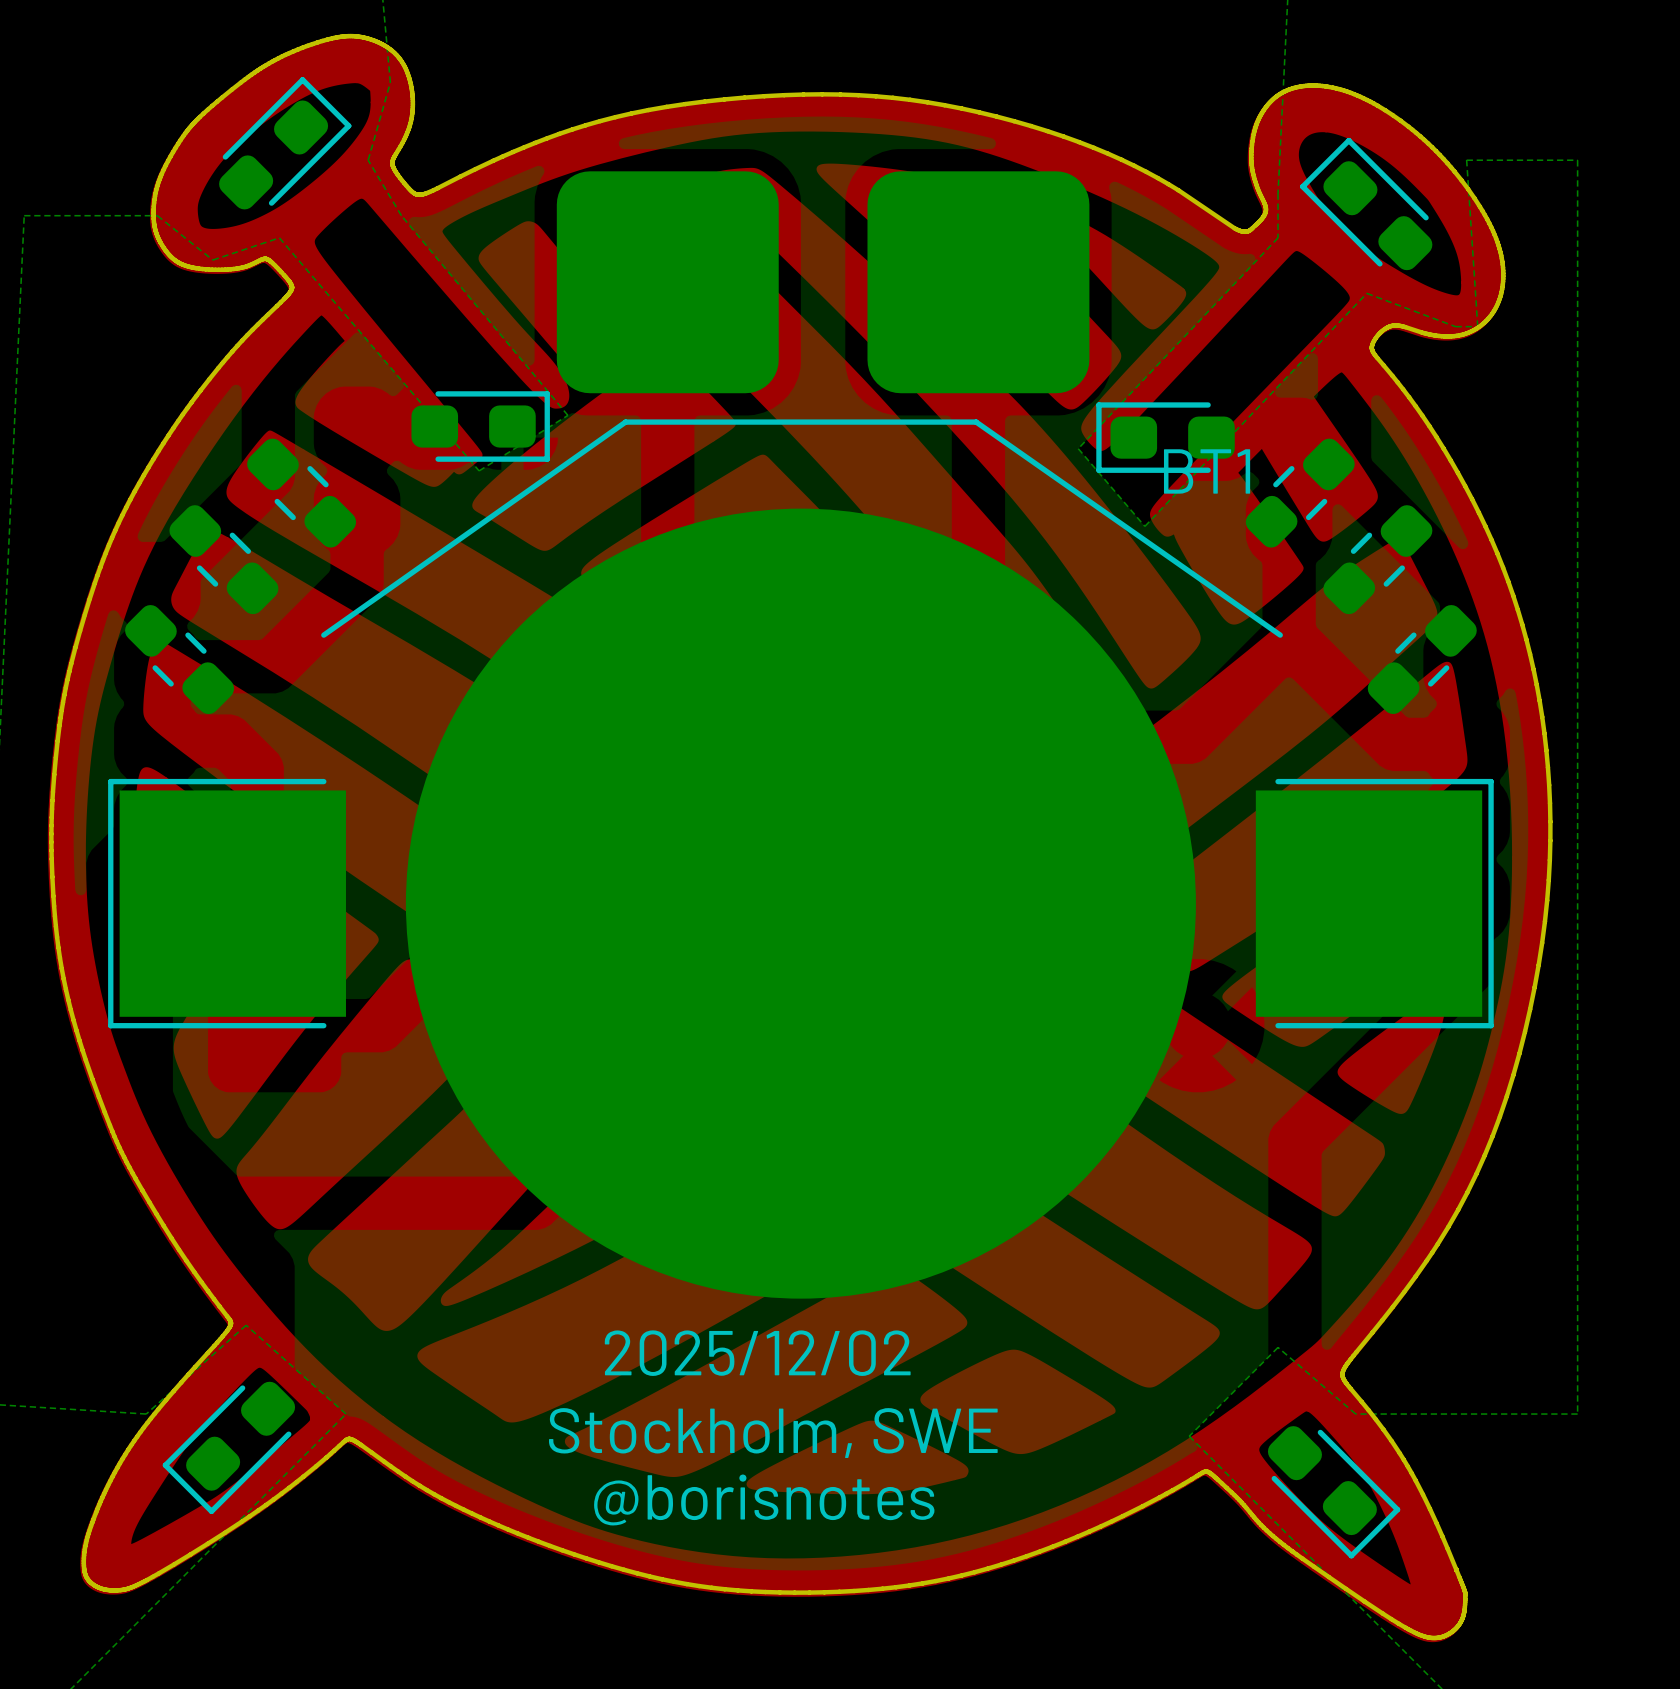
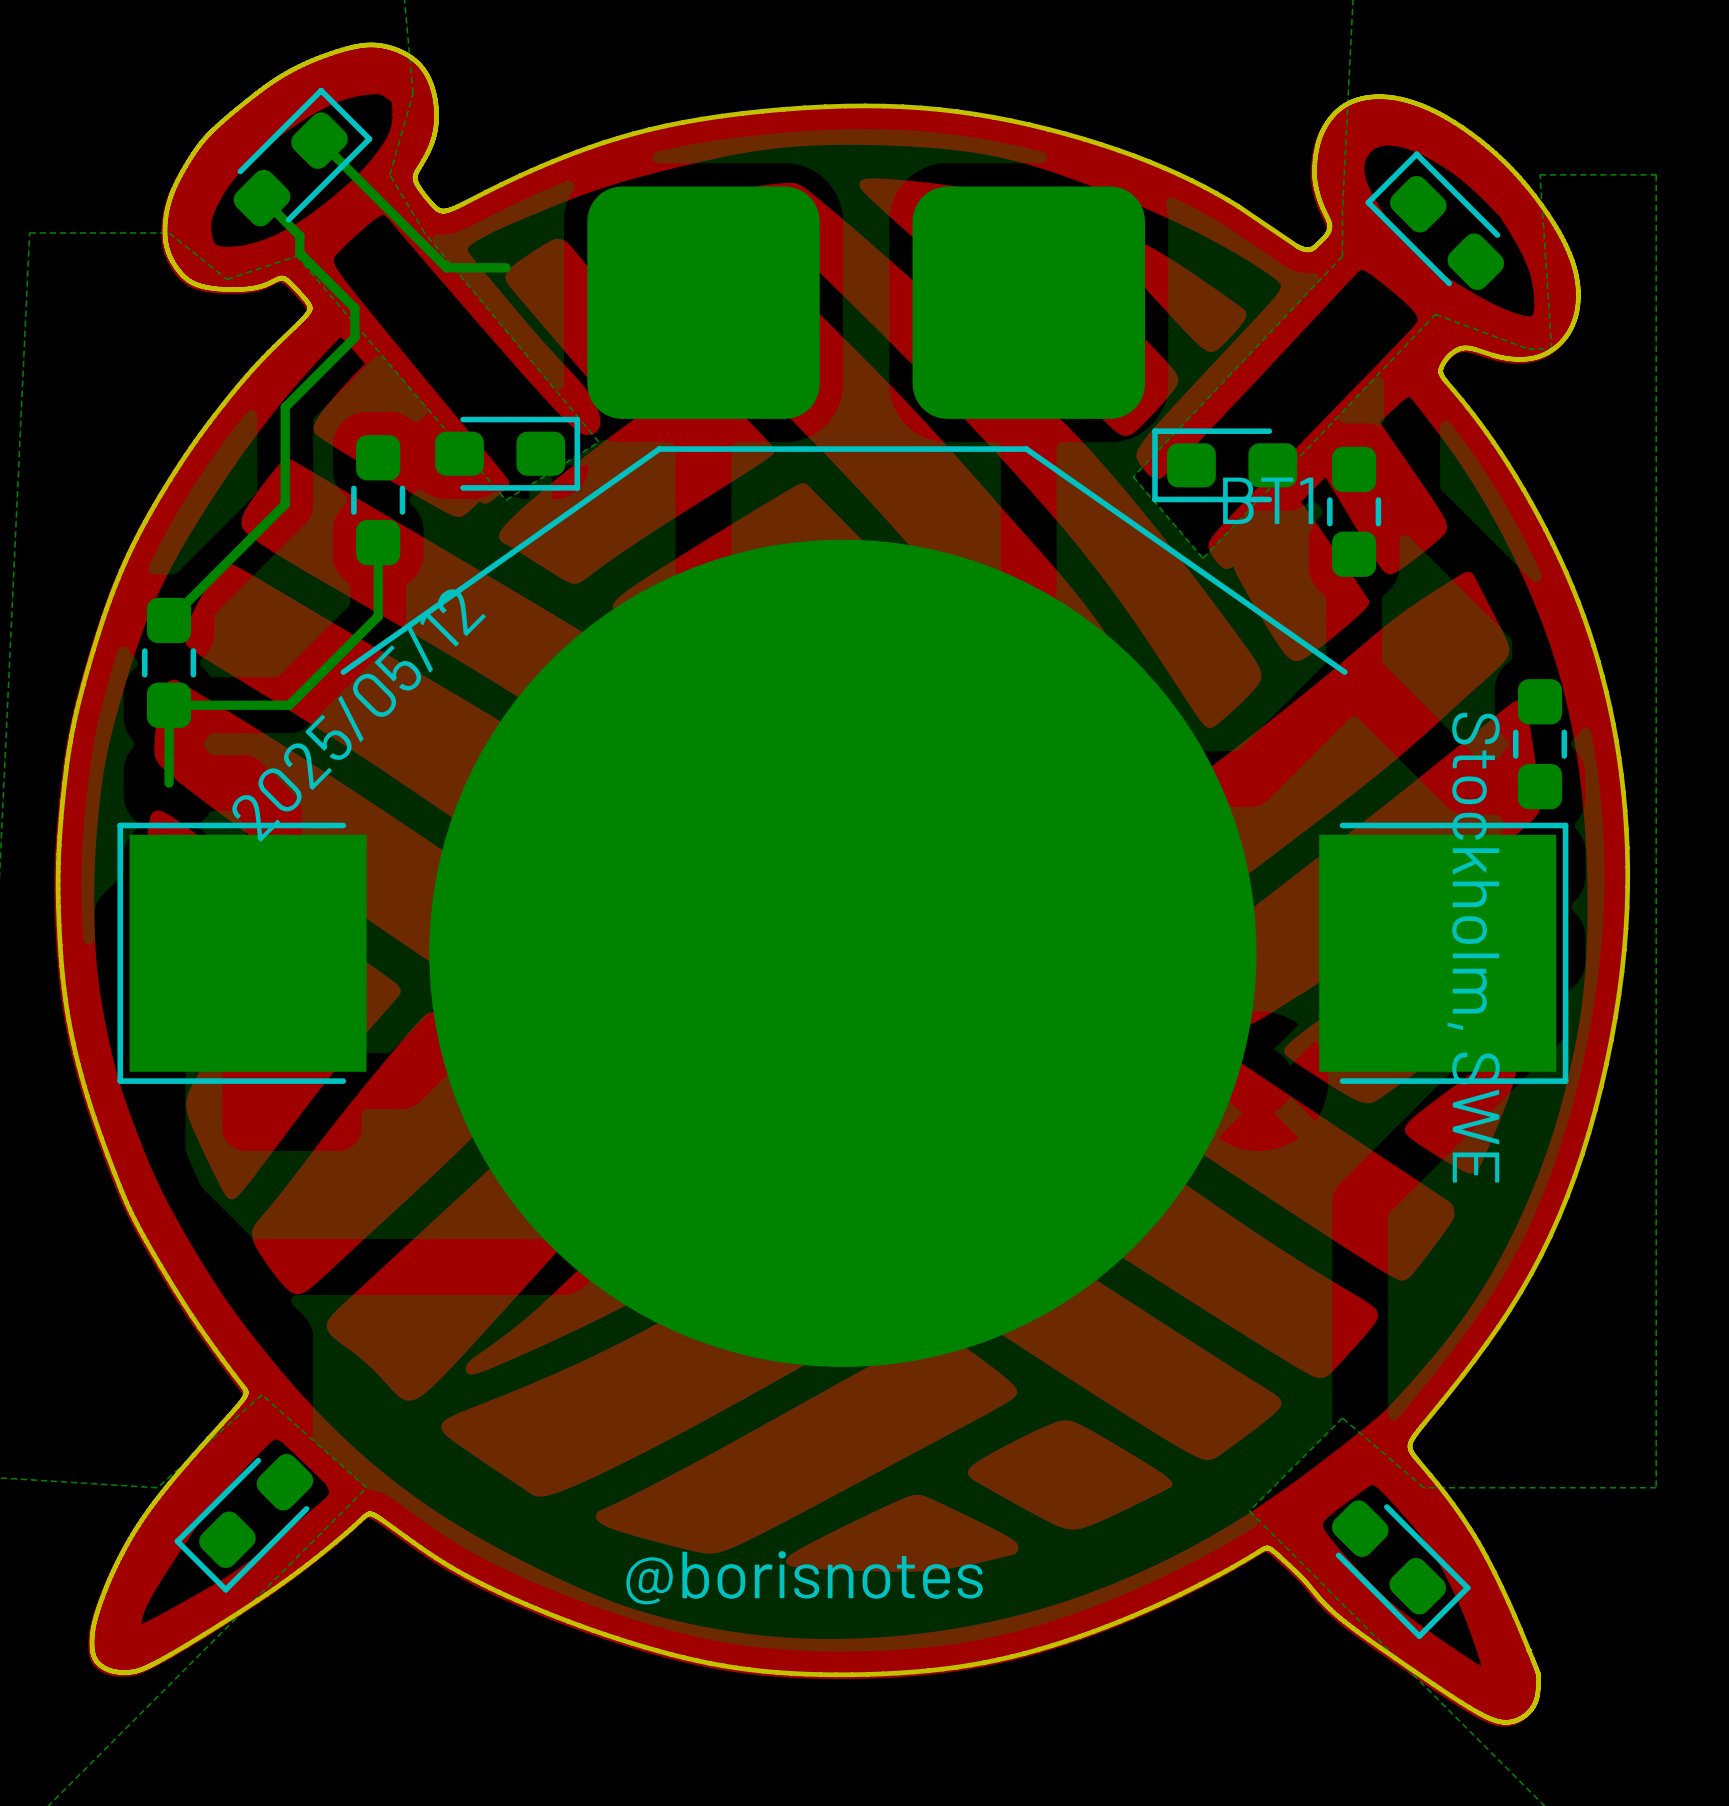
bottom track: none -> (319, 140) (446, 267) (505, 267)
bottom track: none -> (262, 198) (299, 235) (299, 253) (354, 308) (354, 337) (285, 407) (285, 504) (169, 620)
part: none -> (378, 500)
part: (301, 493) -> none
part rotation: 0° (1300, 493) -> 45° counterclockwise (1354, 511)
bottom track: none -> (378, 542) (378, 616) (289, 705) (169, 705) (169, 783)
part: (223, 559) -> none
part: (1377, 559) -> none
part rotation: 0° (179, 659) -> 45° clockwise (169, 662)
part: (1422, 659) -> none
text: none -> 2025/05/12 (358, 715)
part: none -> (1540, 744)
text: none -> Stockholm, SWE (1473, 947)
text: 2025/12/02 (757, 1353) -> none
text: Stockholm, SWE (773, 1433) -> none

